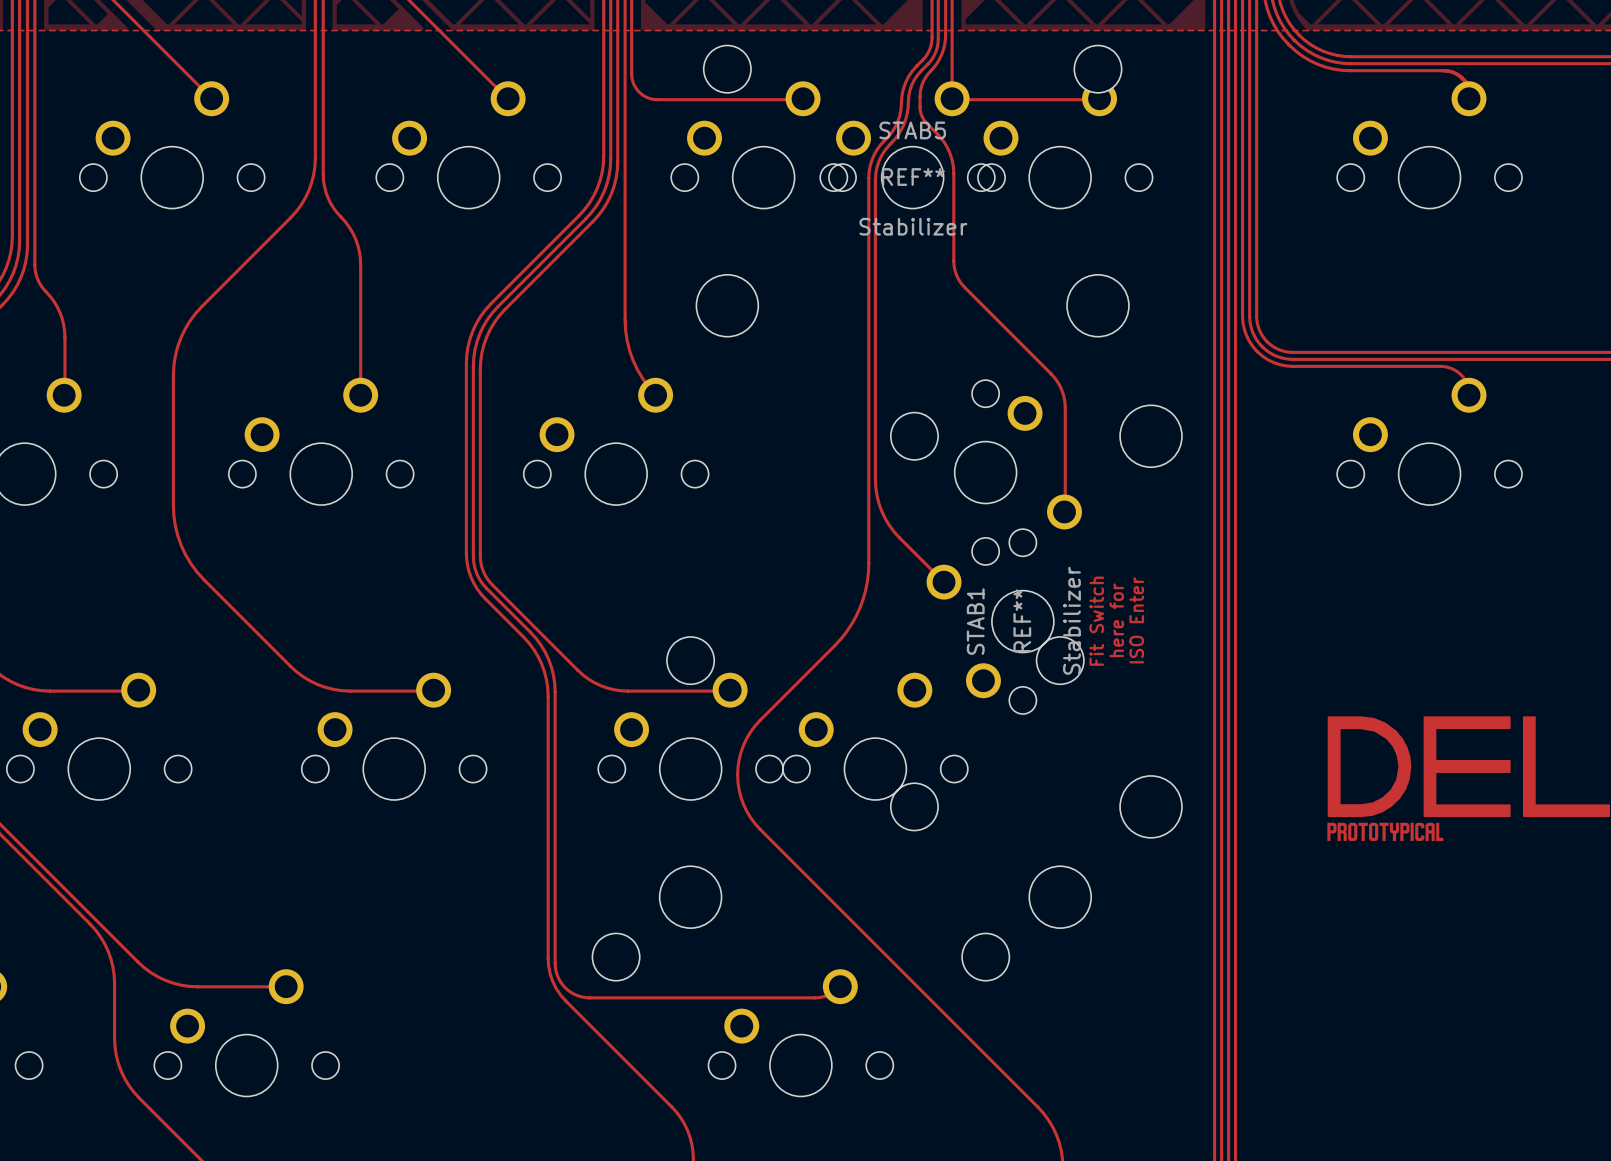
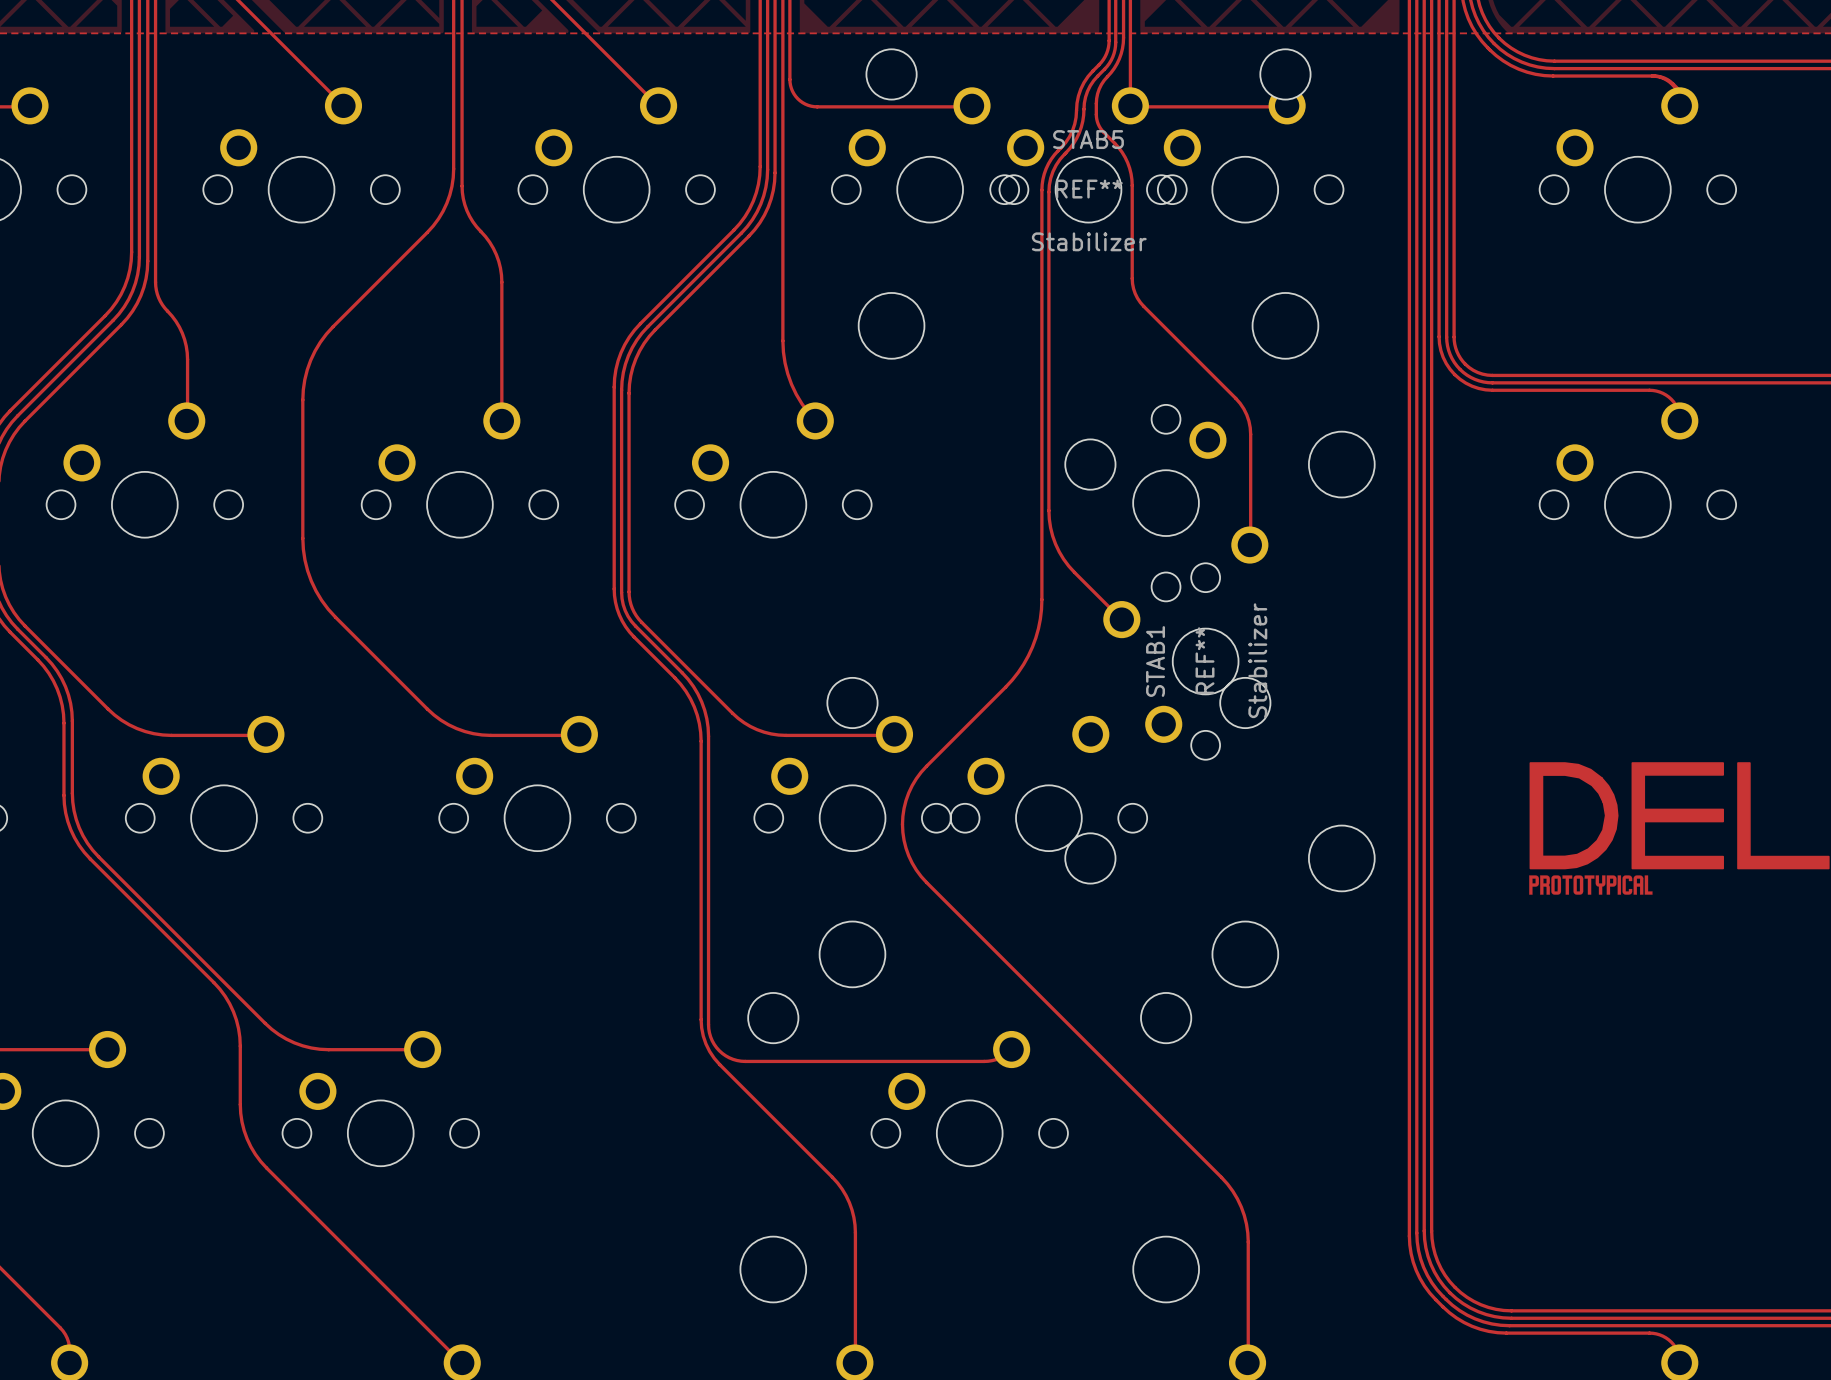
text: here for (1116, 620) -> none
text: ISO Enter (1136, 620) -> none
text: Fit Switch (1096, 621) -> none

